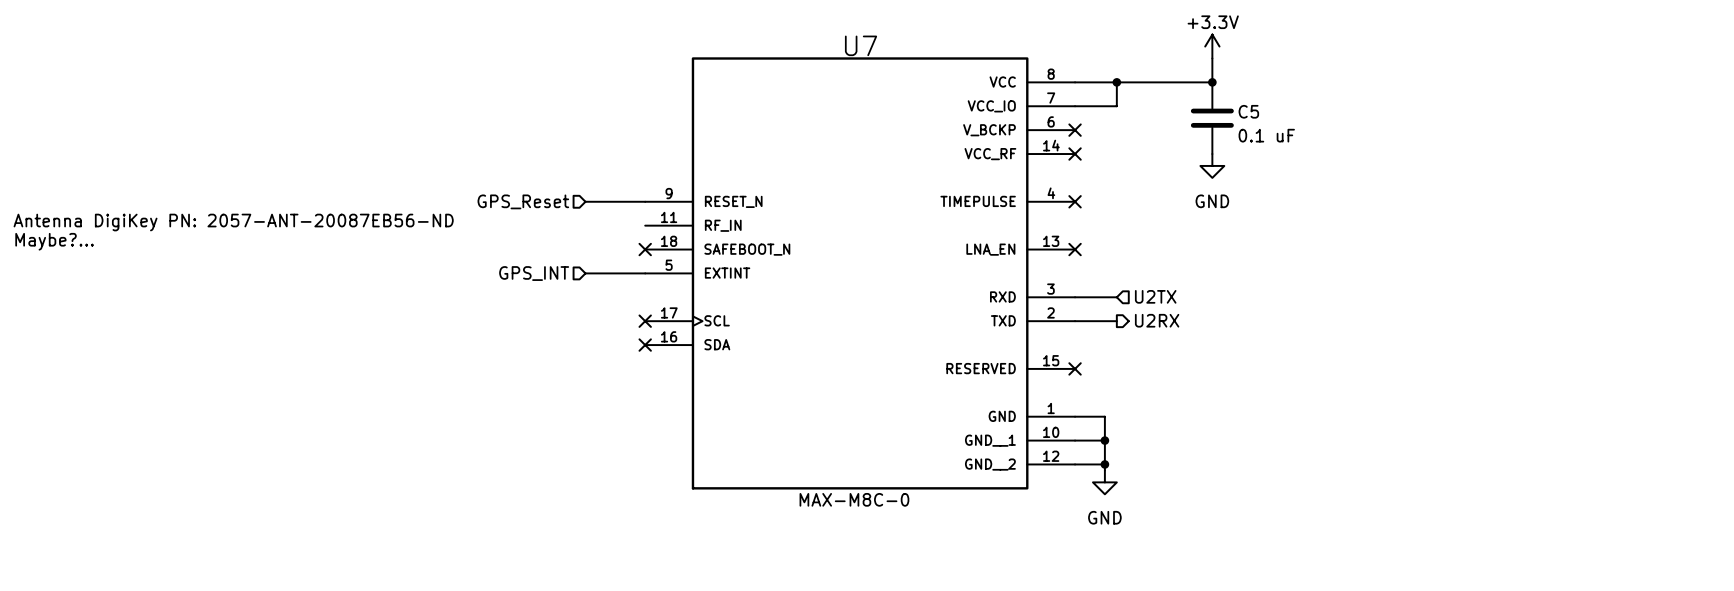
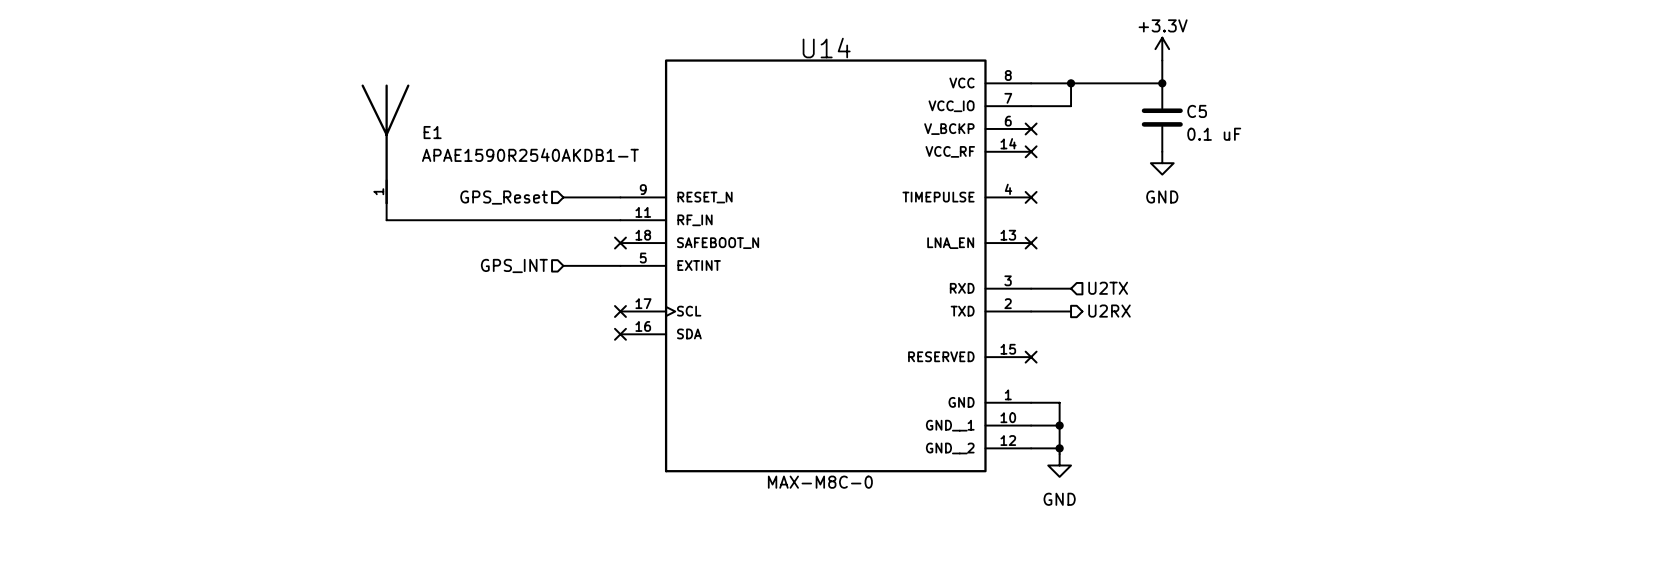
U7 name: U7 (861, 45) -> U14 (826, 48)
E1: none -> APAE1590R2540AKDB1-T (385, 144)
wire: none -> (386, 203) (386, 220) (620, 220)
text: Antenna DigiKey PN: 2057-ANT-20087EB56-ND (233, 222) -> none
text: Maybe?... (54, 241) -> none

